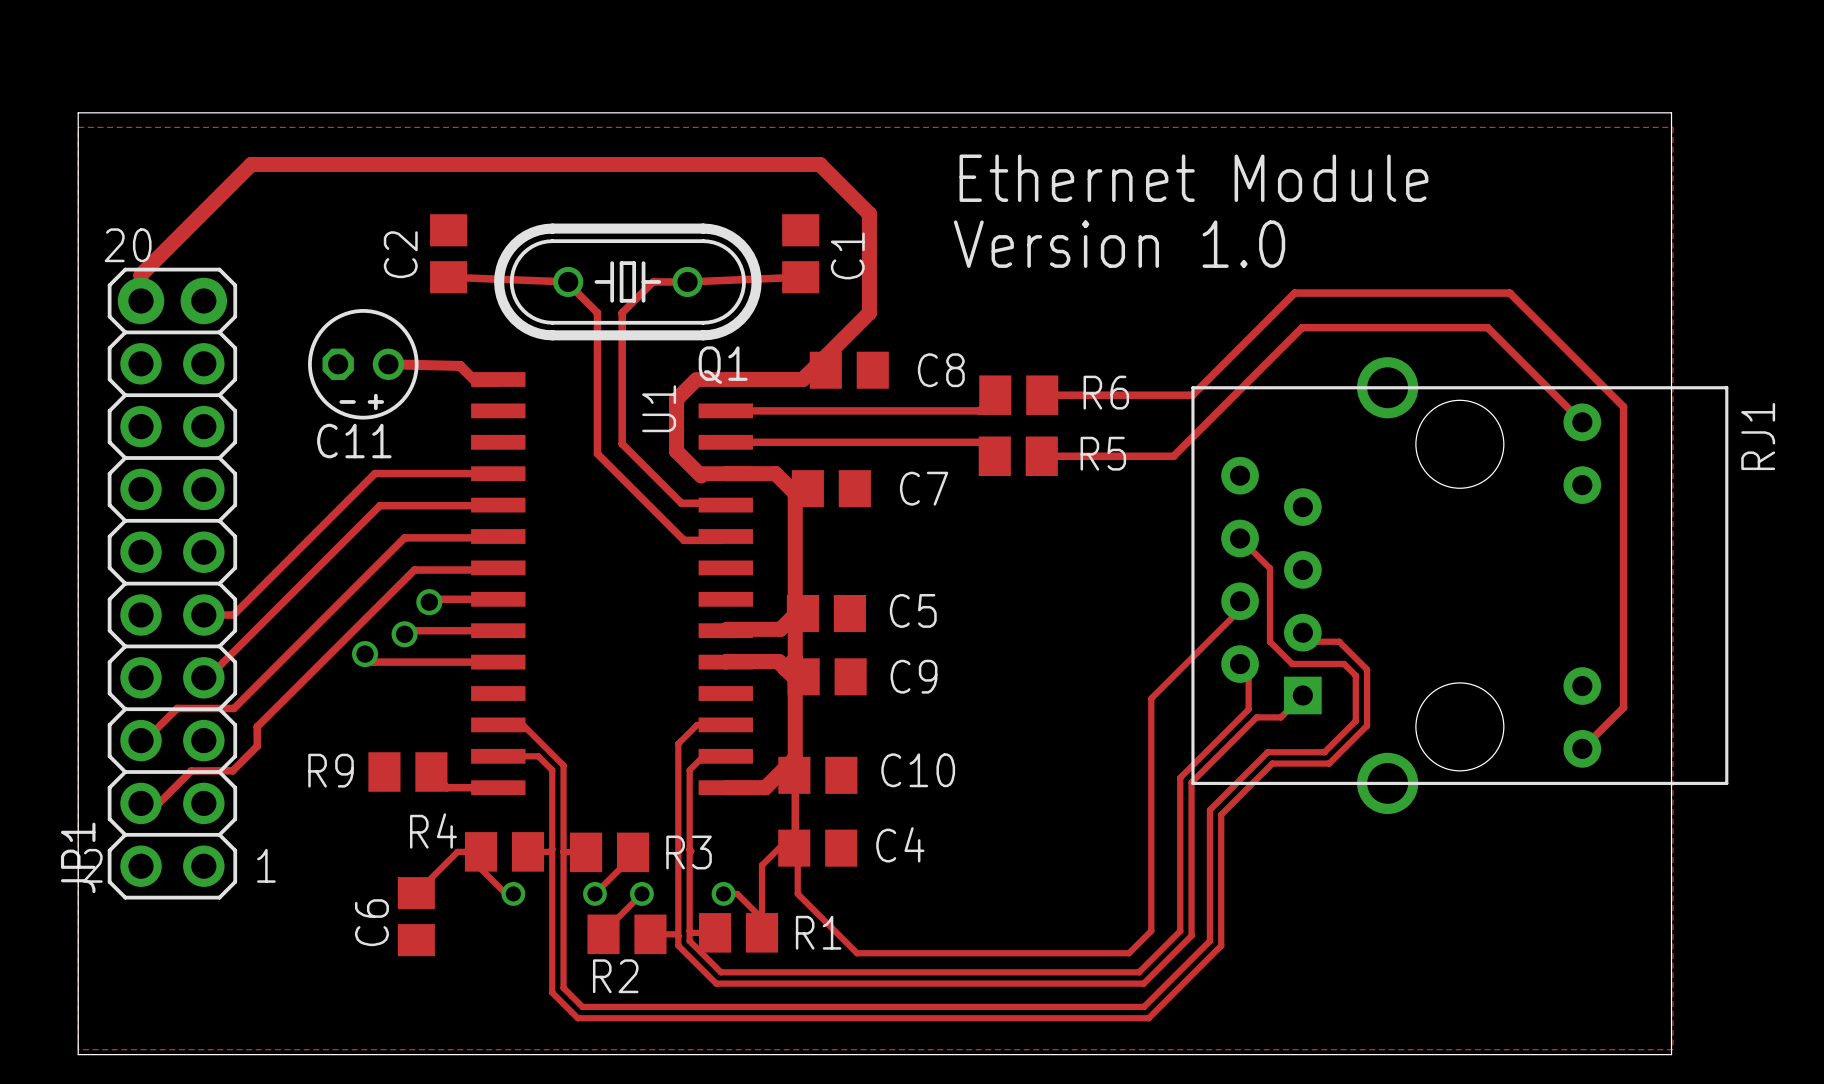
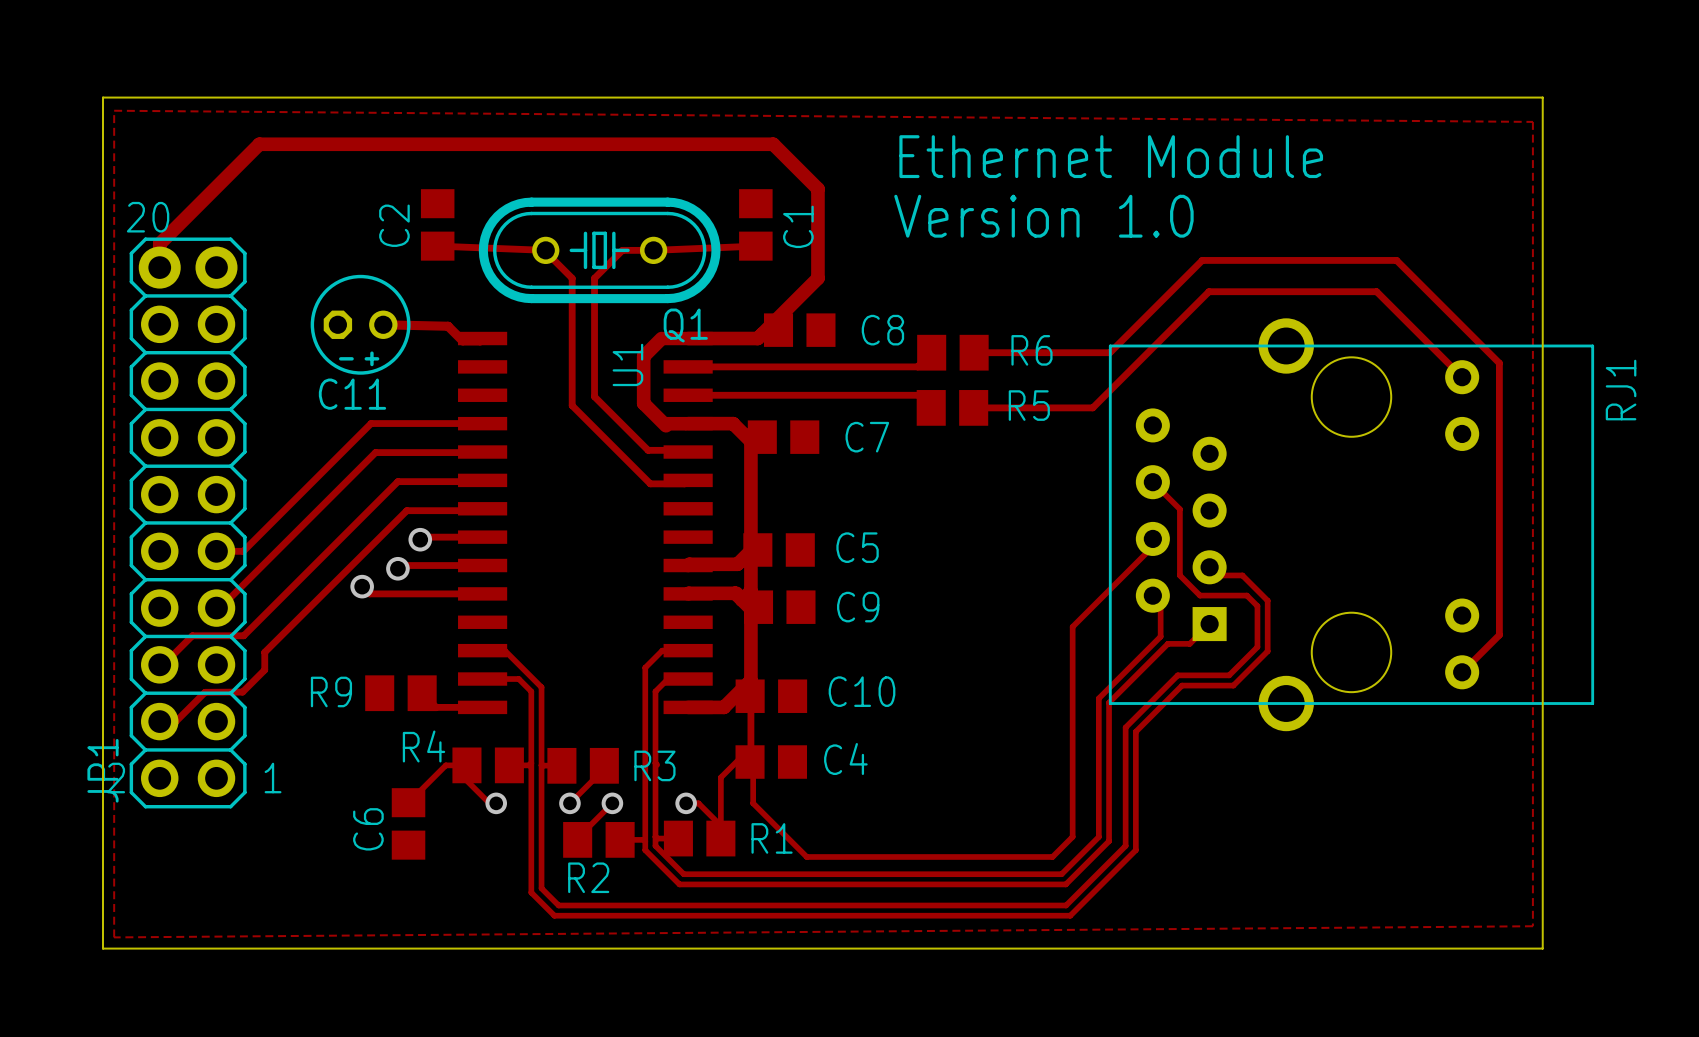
zone outline: (78, 127) (1673, 127) (1673, 1049) (78, 1049) (78, 127) -> (114, 110) (114, 937) (1532, 926) (1532, 121) (114, 110)

